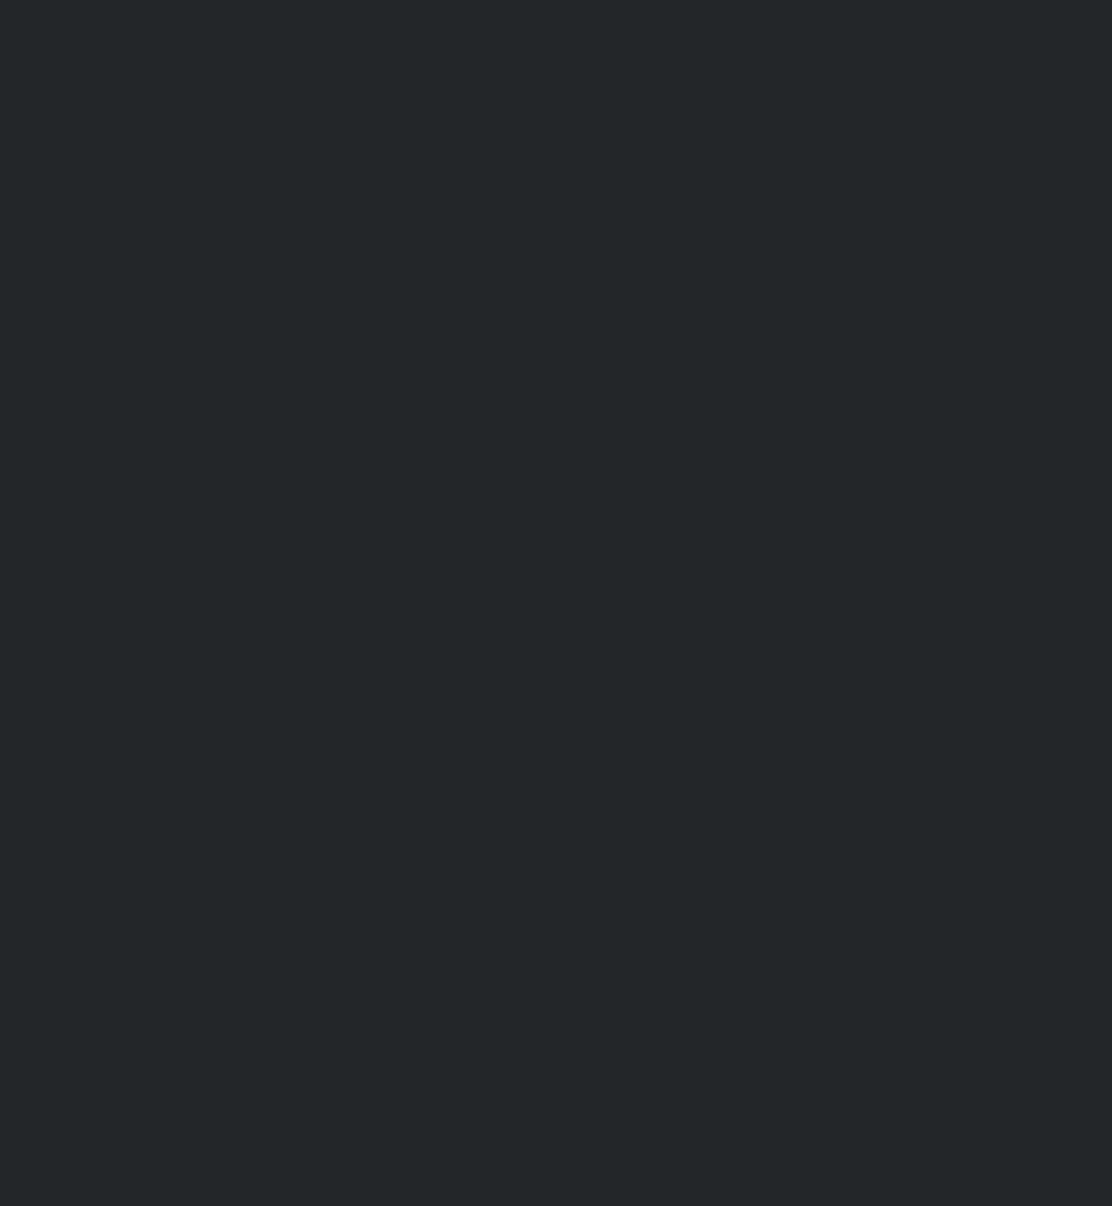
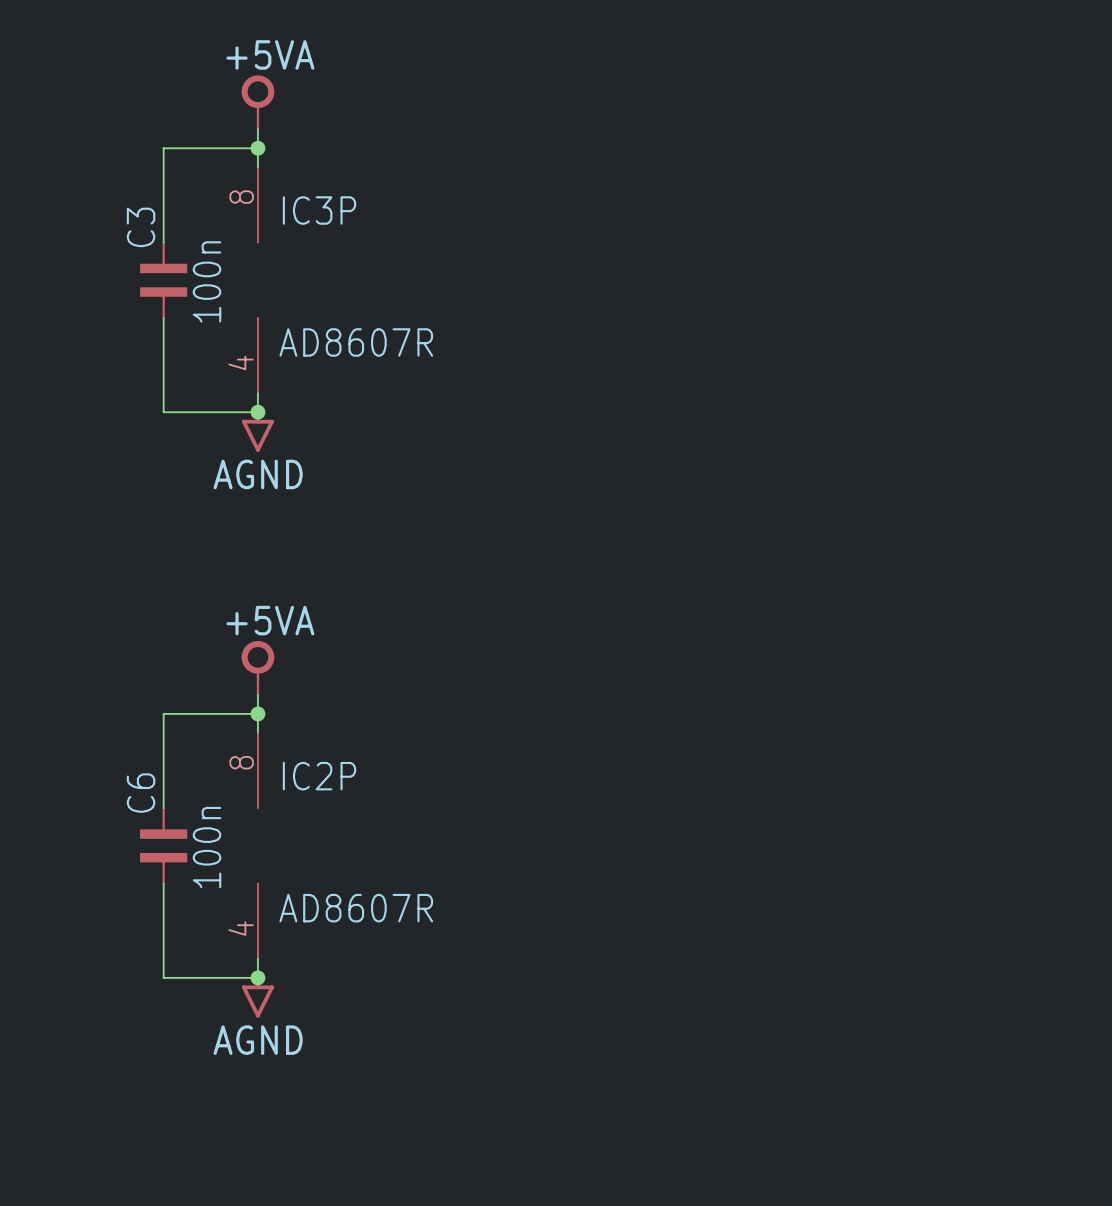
power symbol: none -> +5VA (257, 102)
wire: none -> (257, 129) (257, 167)
wire: none -> (257, 148) (163, 148) (163, 242)
junction: none -> (257, 148)
C3: none -> 100n (163, 280)
IC3P: none -> AD8607R (257, 280)
wire: none -> (163, 317) (163, 412) (257, 412) (257, 393)
junction: none -> (257, 412)
power symbol: none -> AGND (257, 431)
power symbol: none -> +5VA (257, 668)
wire: none -> (257, 695) (257, 732)
wire: none -> (257, 713) (163, 713) (163, 808)
junction: none -> (257, 713)
C6: none -> 100n (163, 845)
IC2P: none -> AD8607R (257, 845)
wire: none -> (163, 883) (163, 977) (257, 977) (257, 959)
junction: none -> (257, 977)
power symbol: none -> AGND (257, 997)

